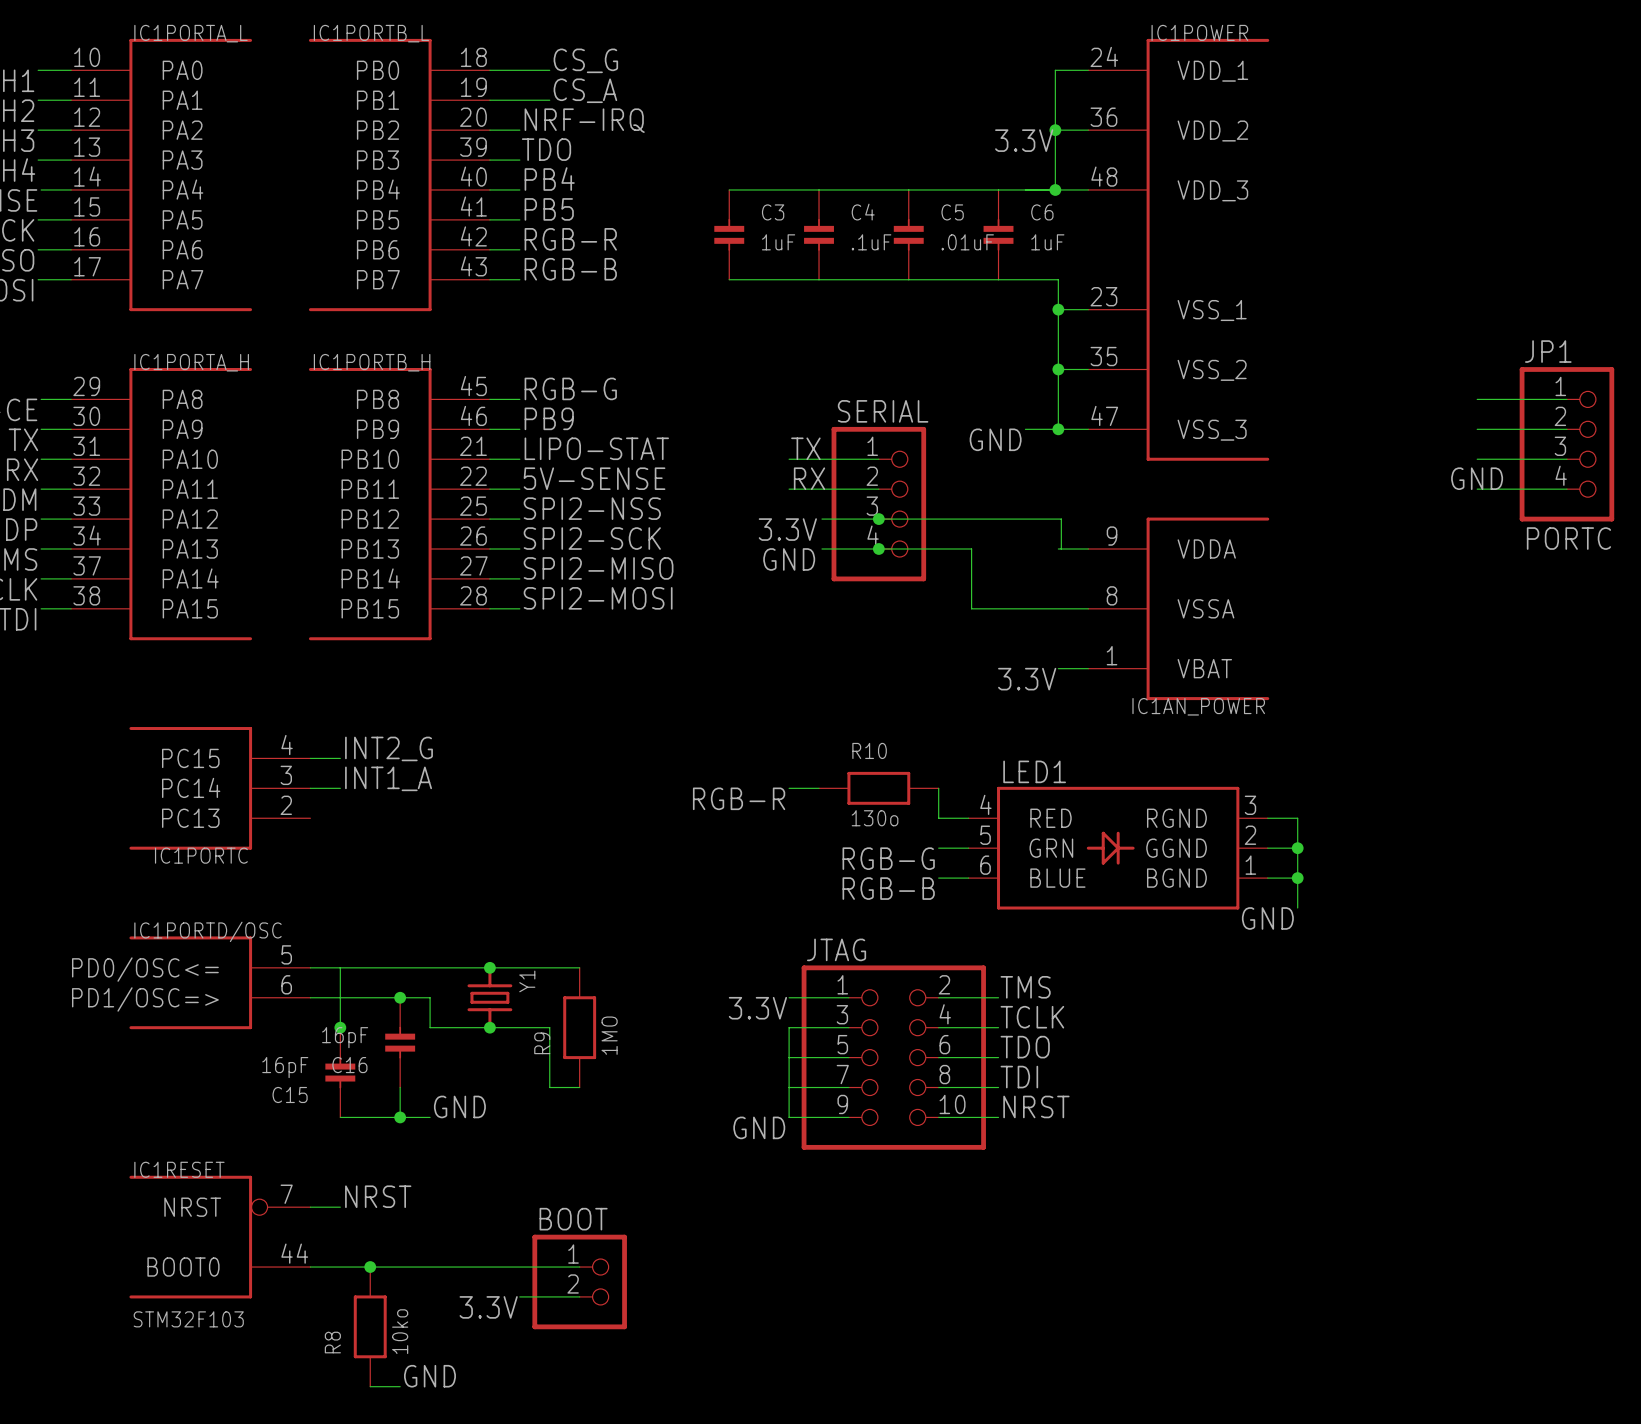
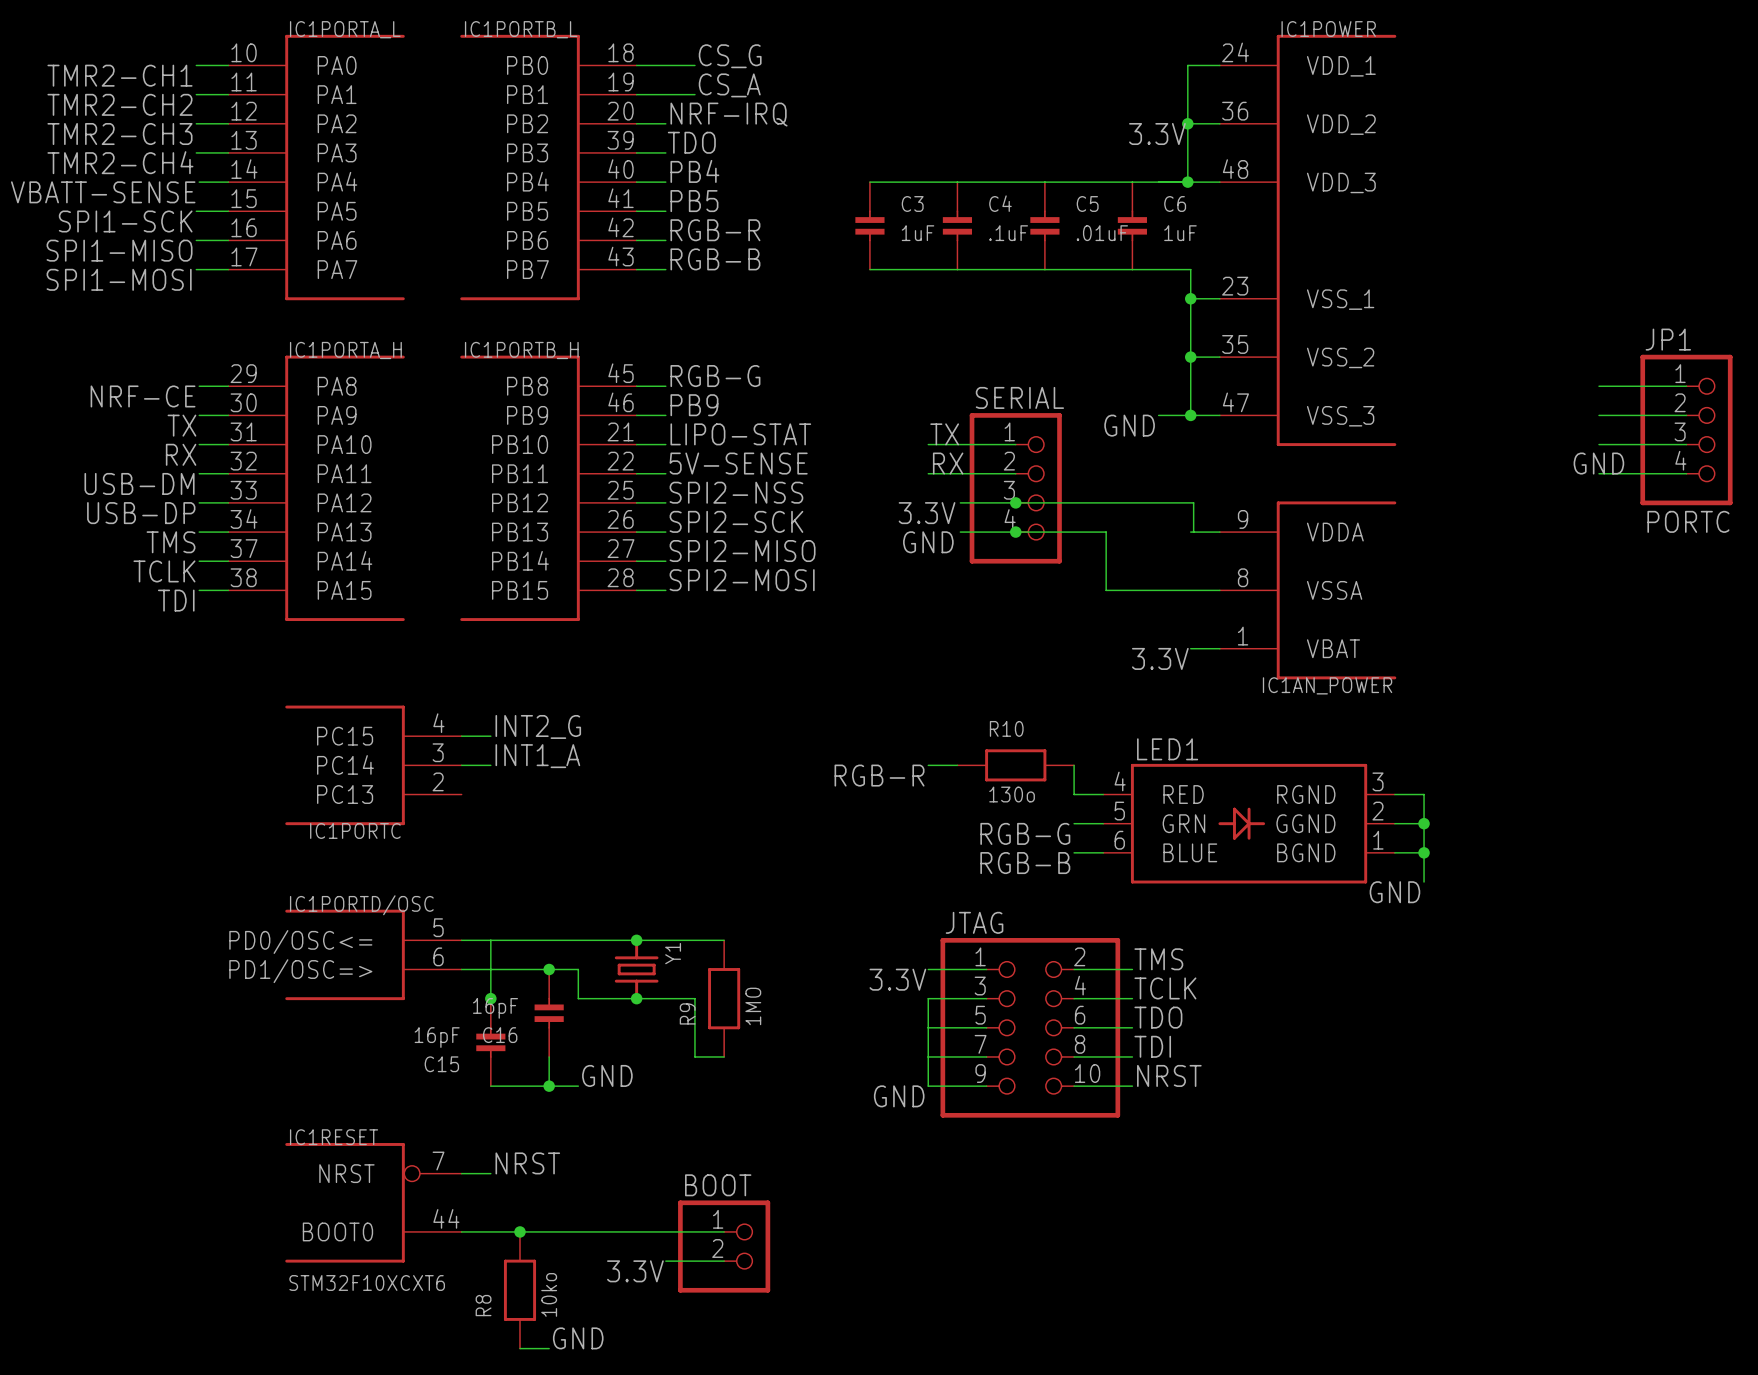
IC1RESET value: STM32F103 (188, 1319) -> STM32F10XCXT6 (367, 1282)

